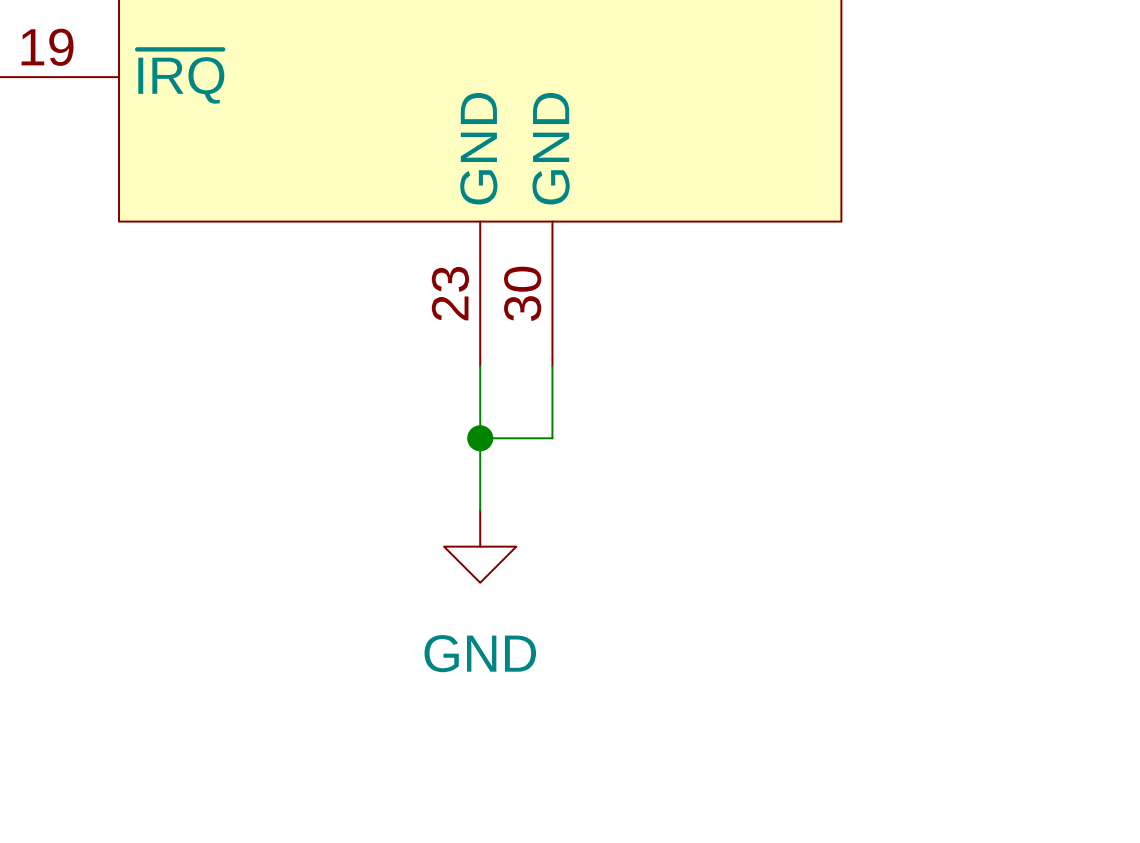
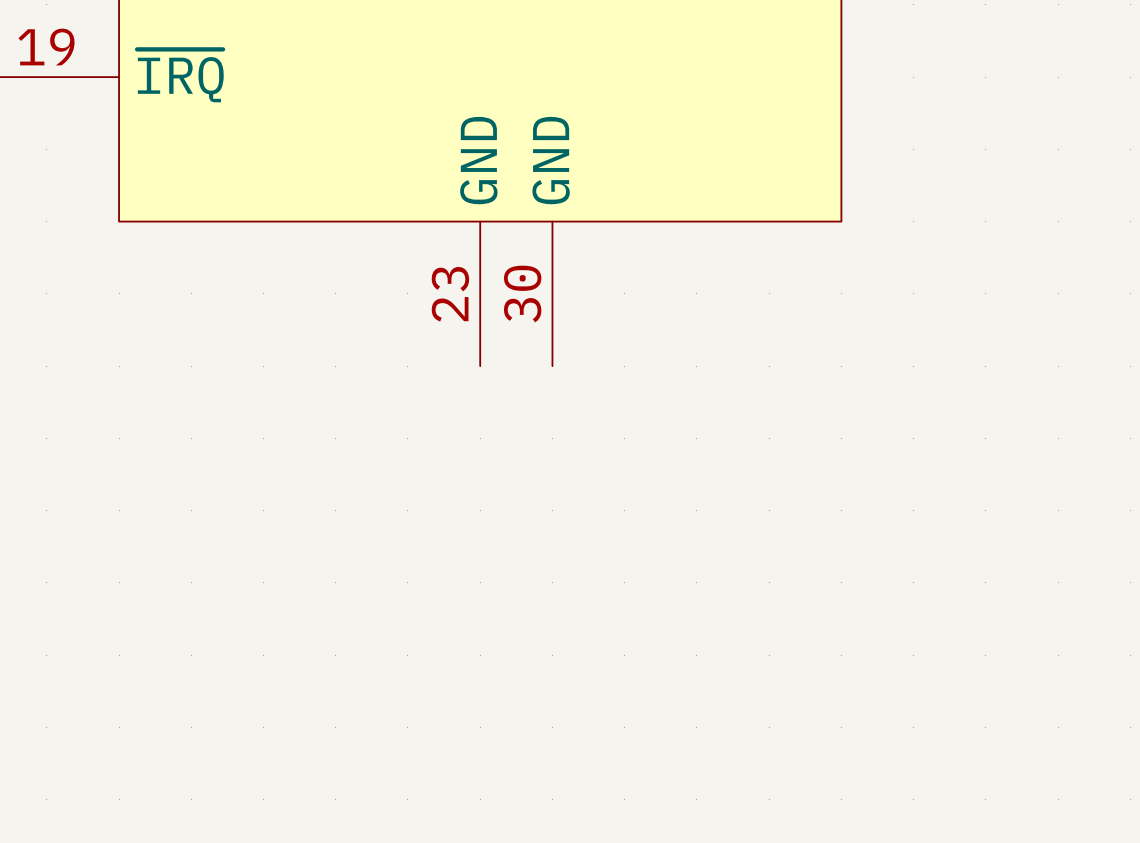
wire: (480, 366) (480, 510) -> none
wire: (552, 366) (552, 438) (480, 438) -> none
junction: (480, 438) -> none
power symbol: GND (480, 546) -> none

